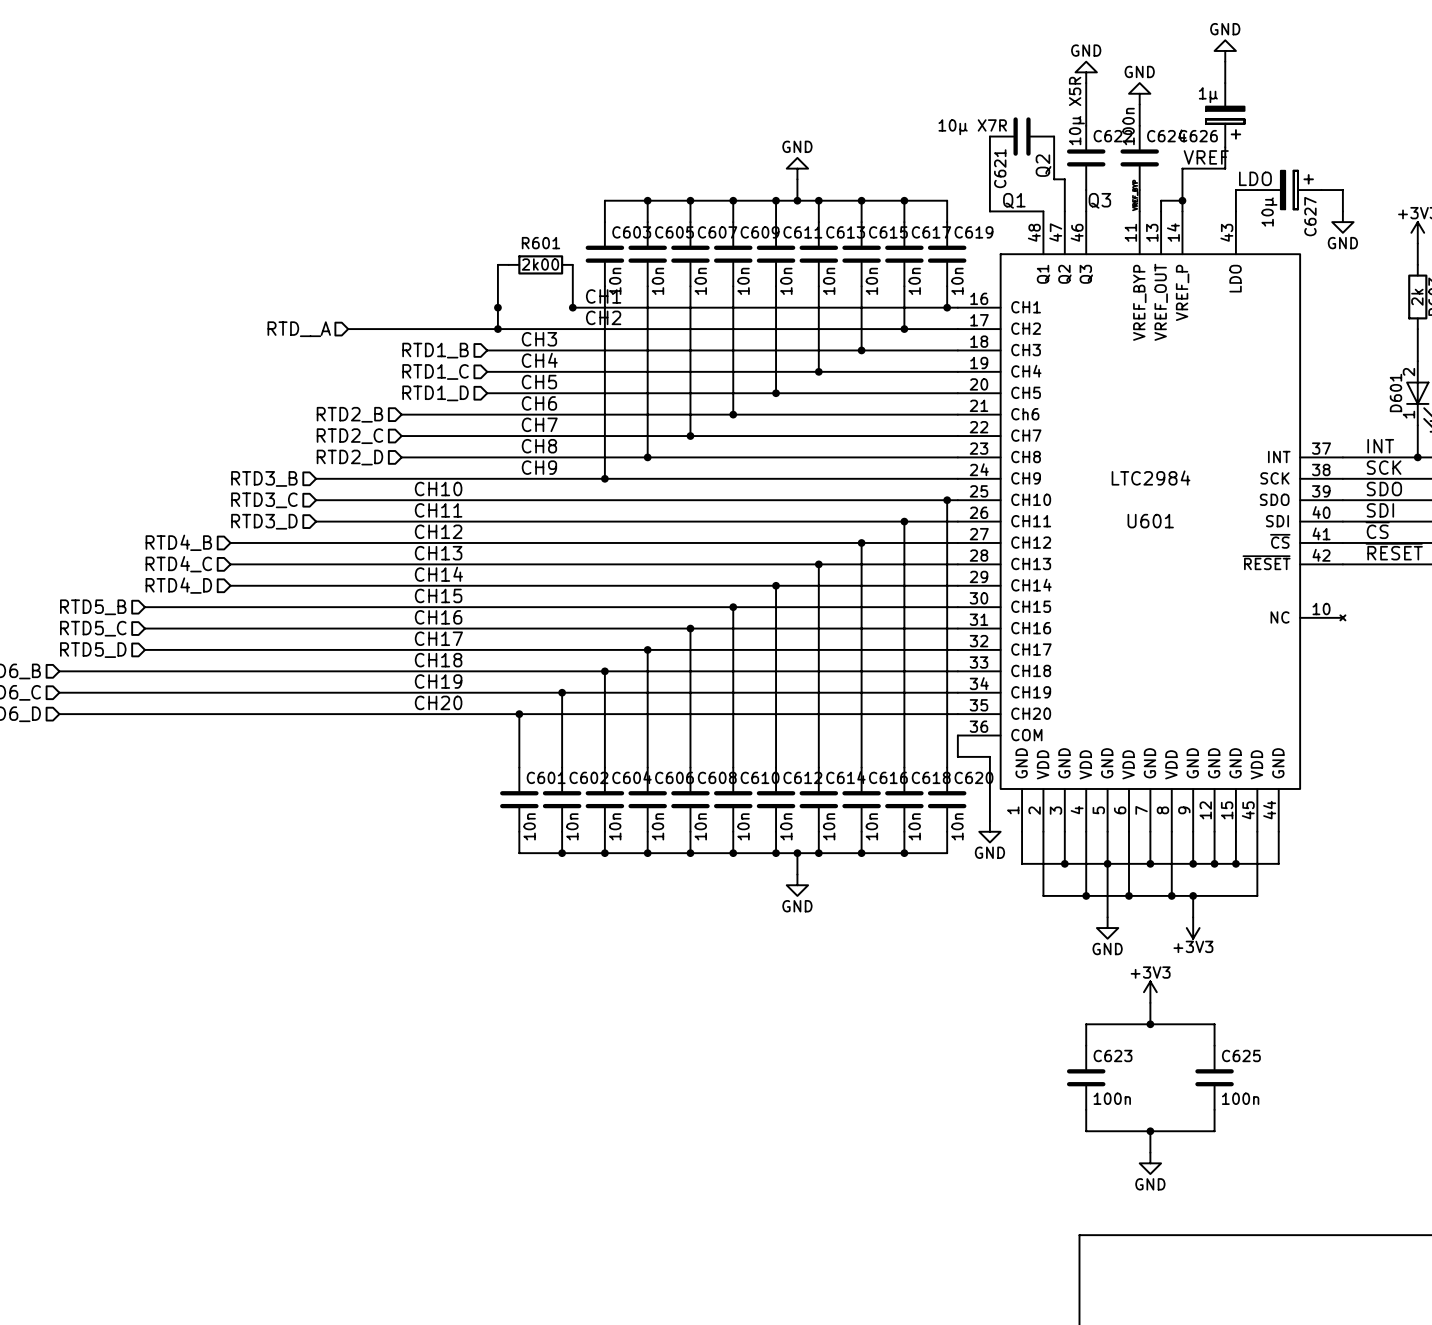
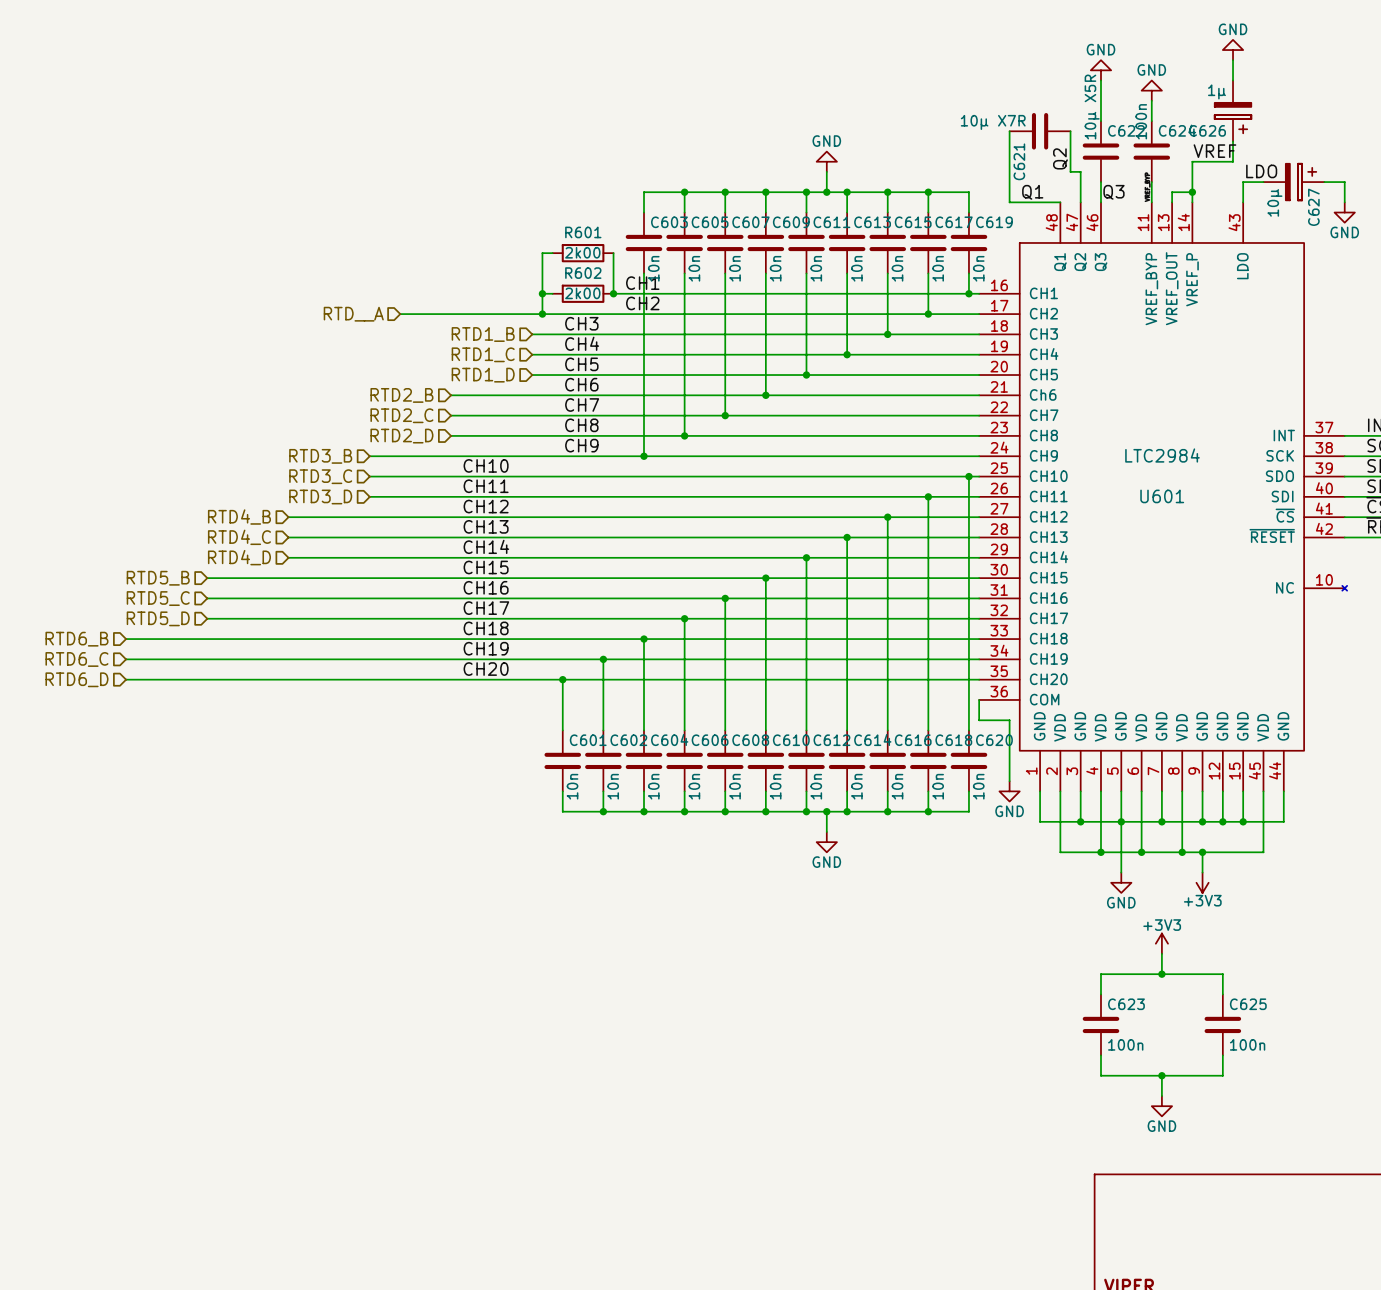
wire: none -> (542, 293) (552, 293)
R602: none -> 2k00 (583, 293)

